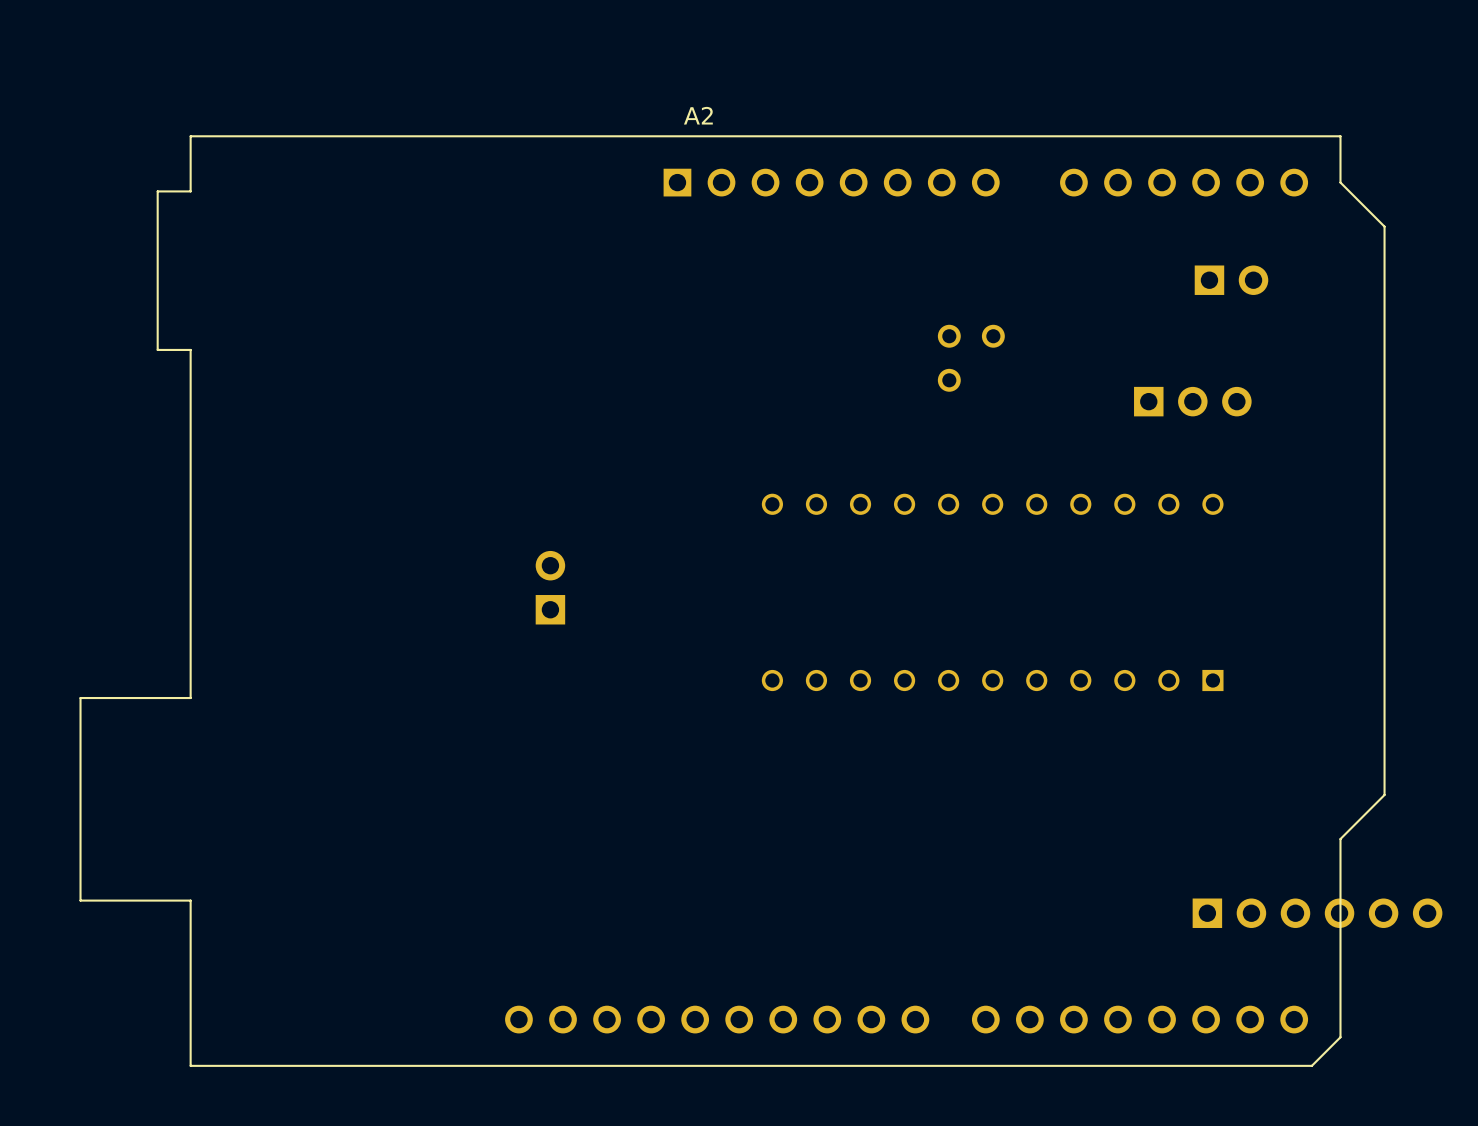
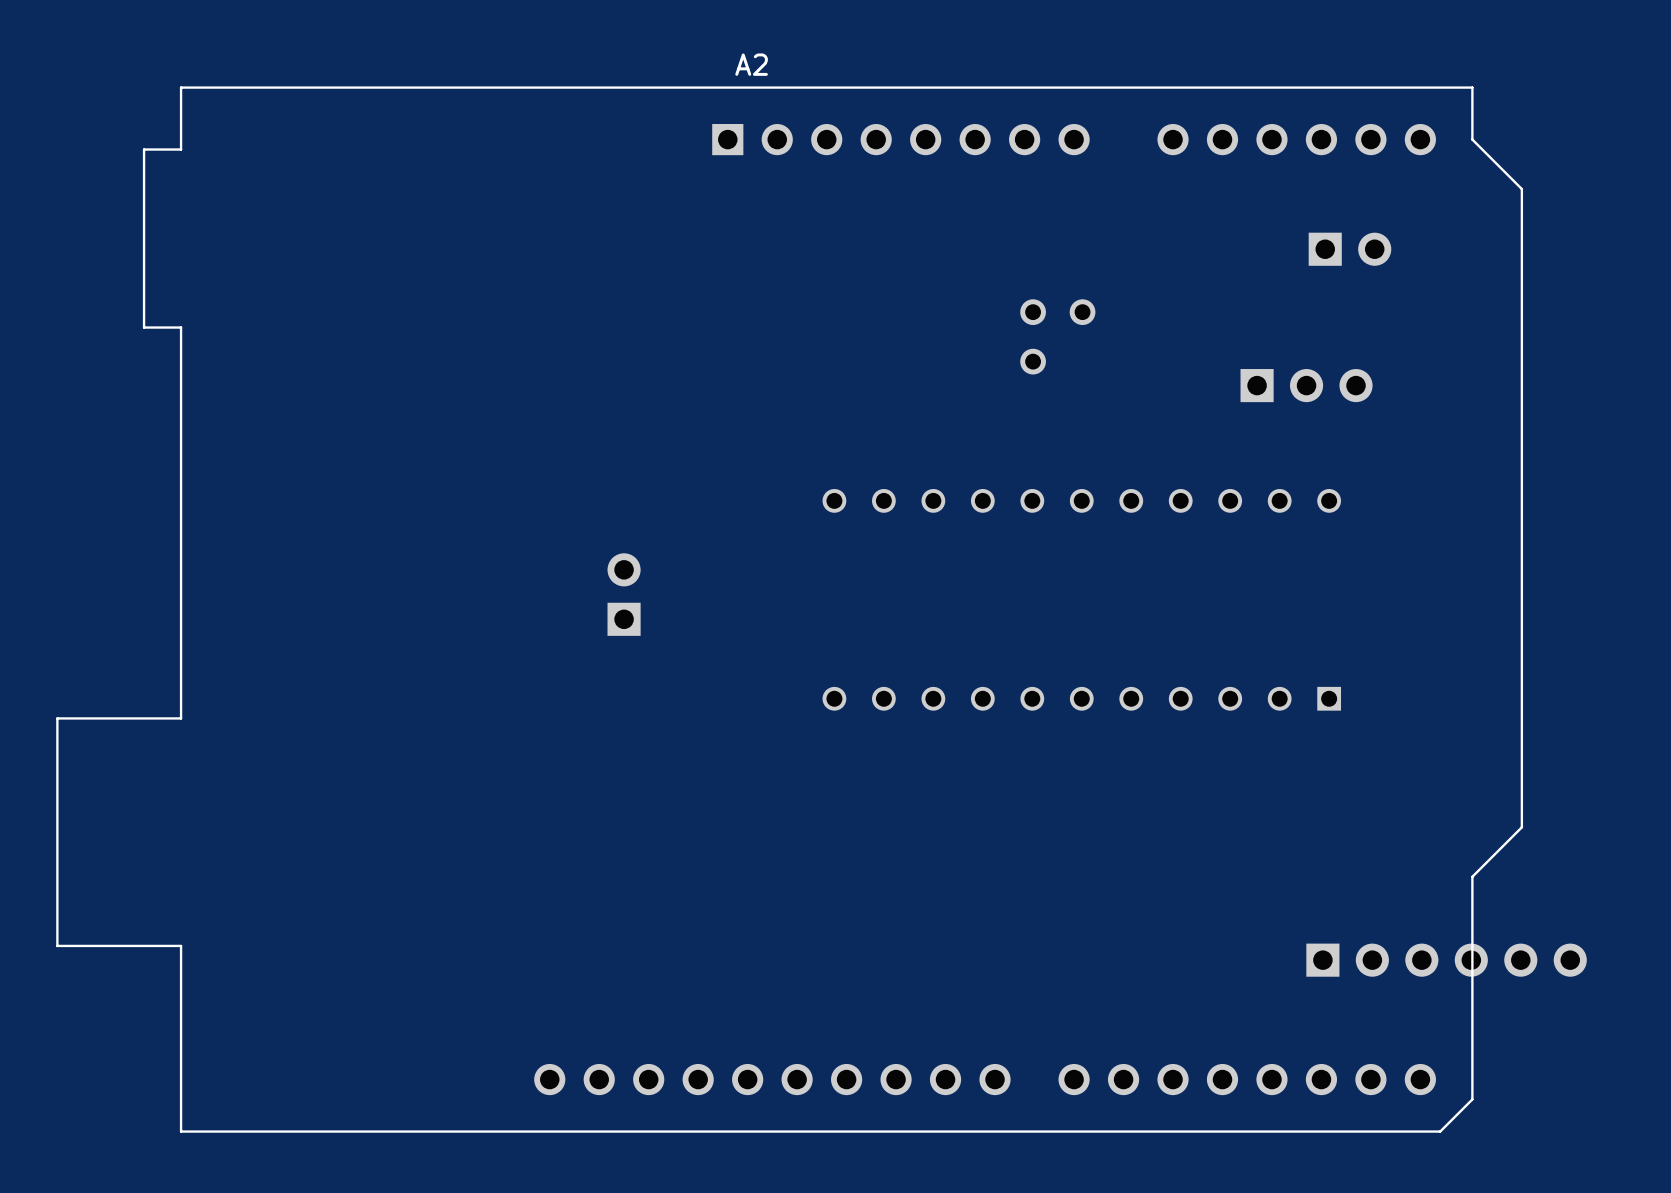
part position: (550, 587) -> (624, 594)

